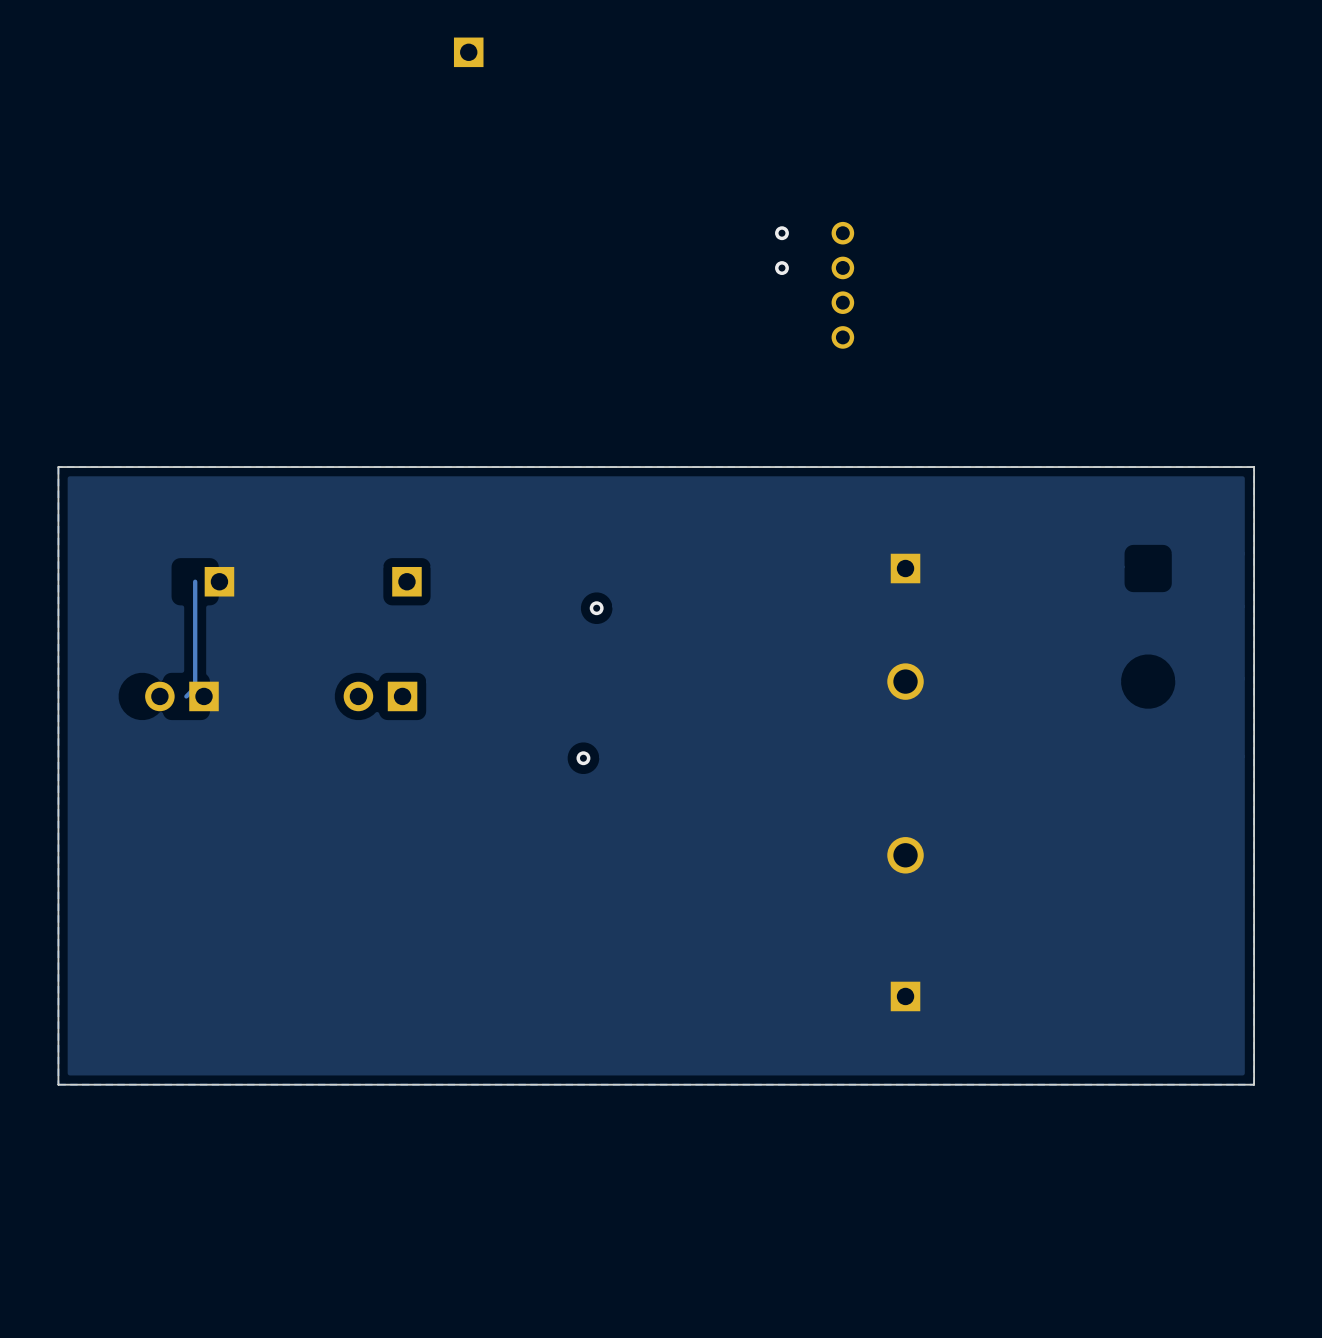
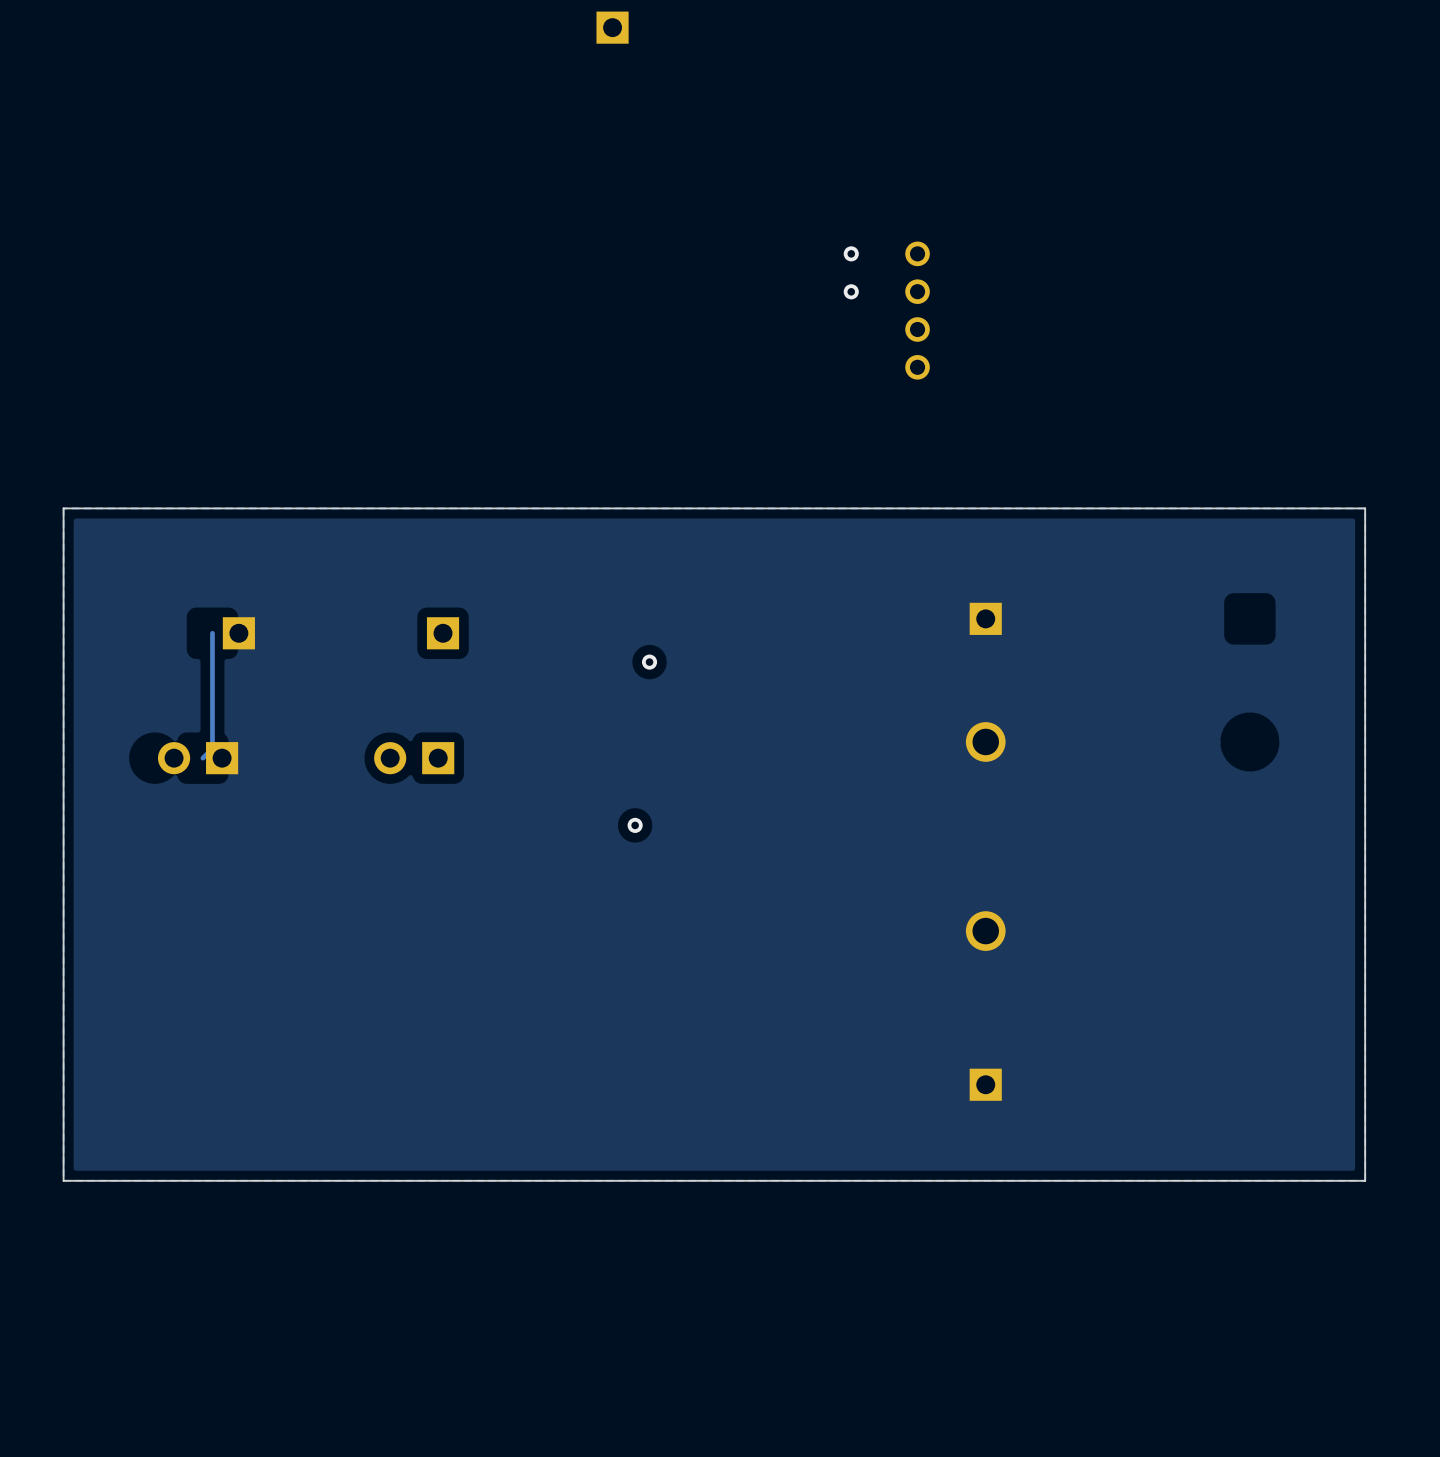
part position: (468, 52) -> (612, 27)

